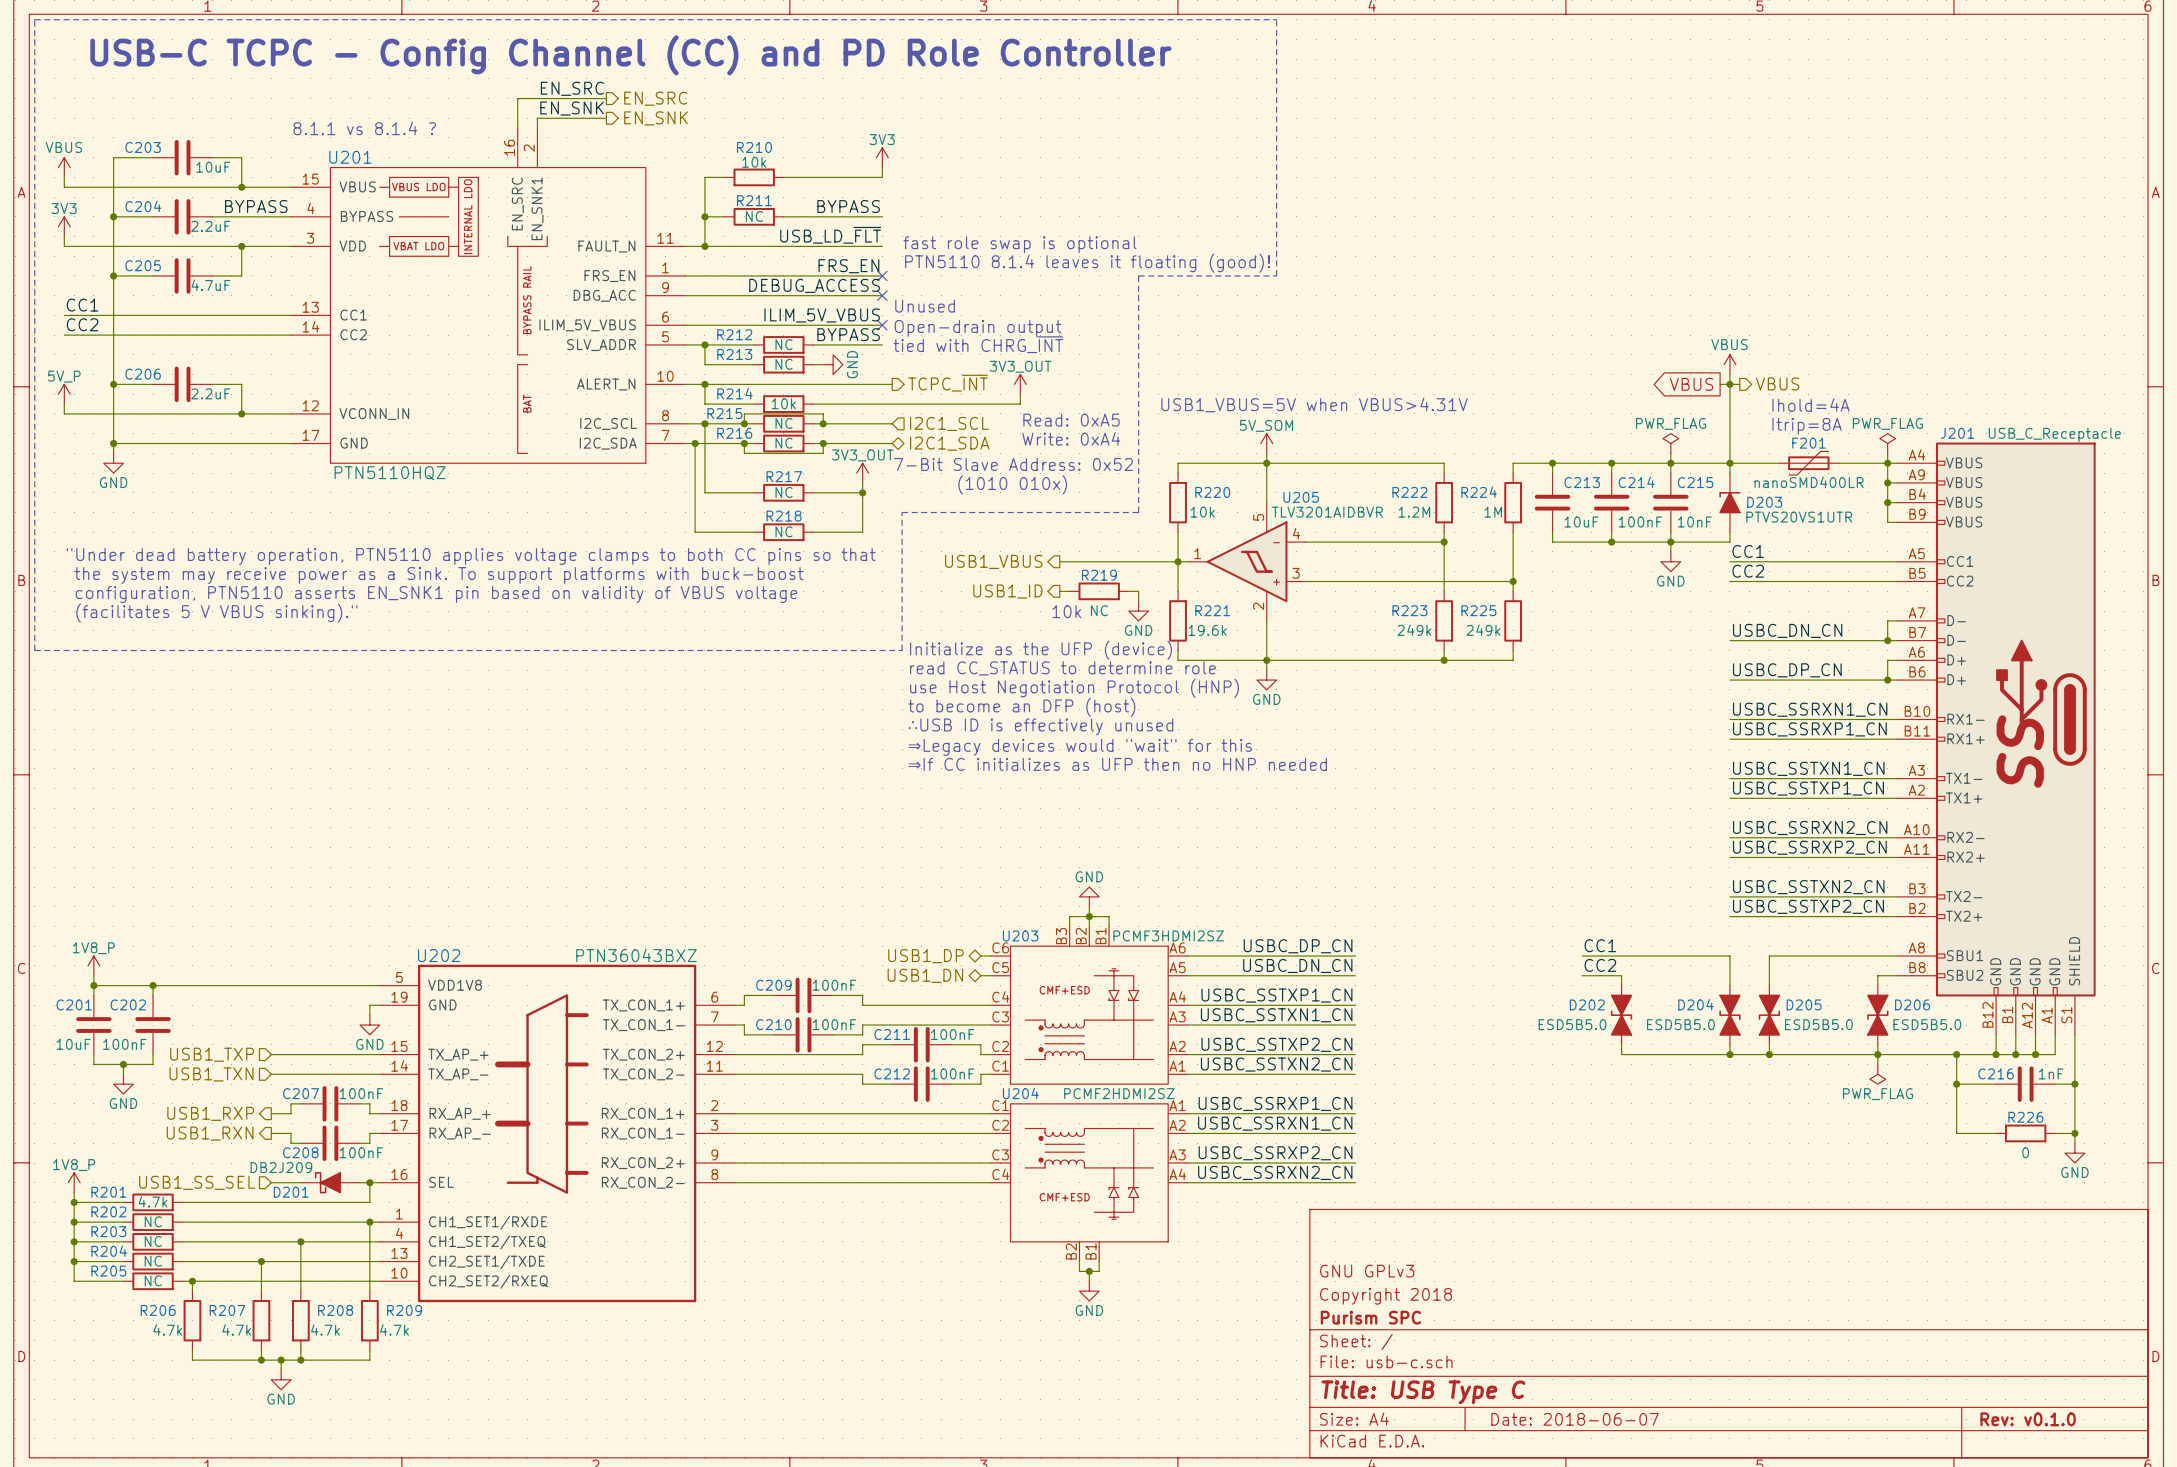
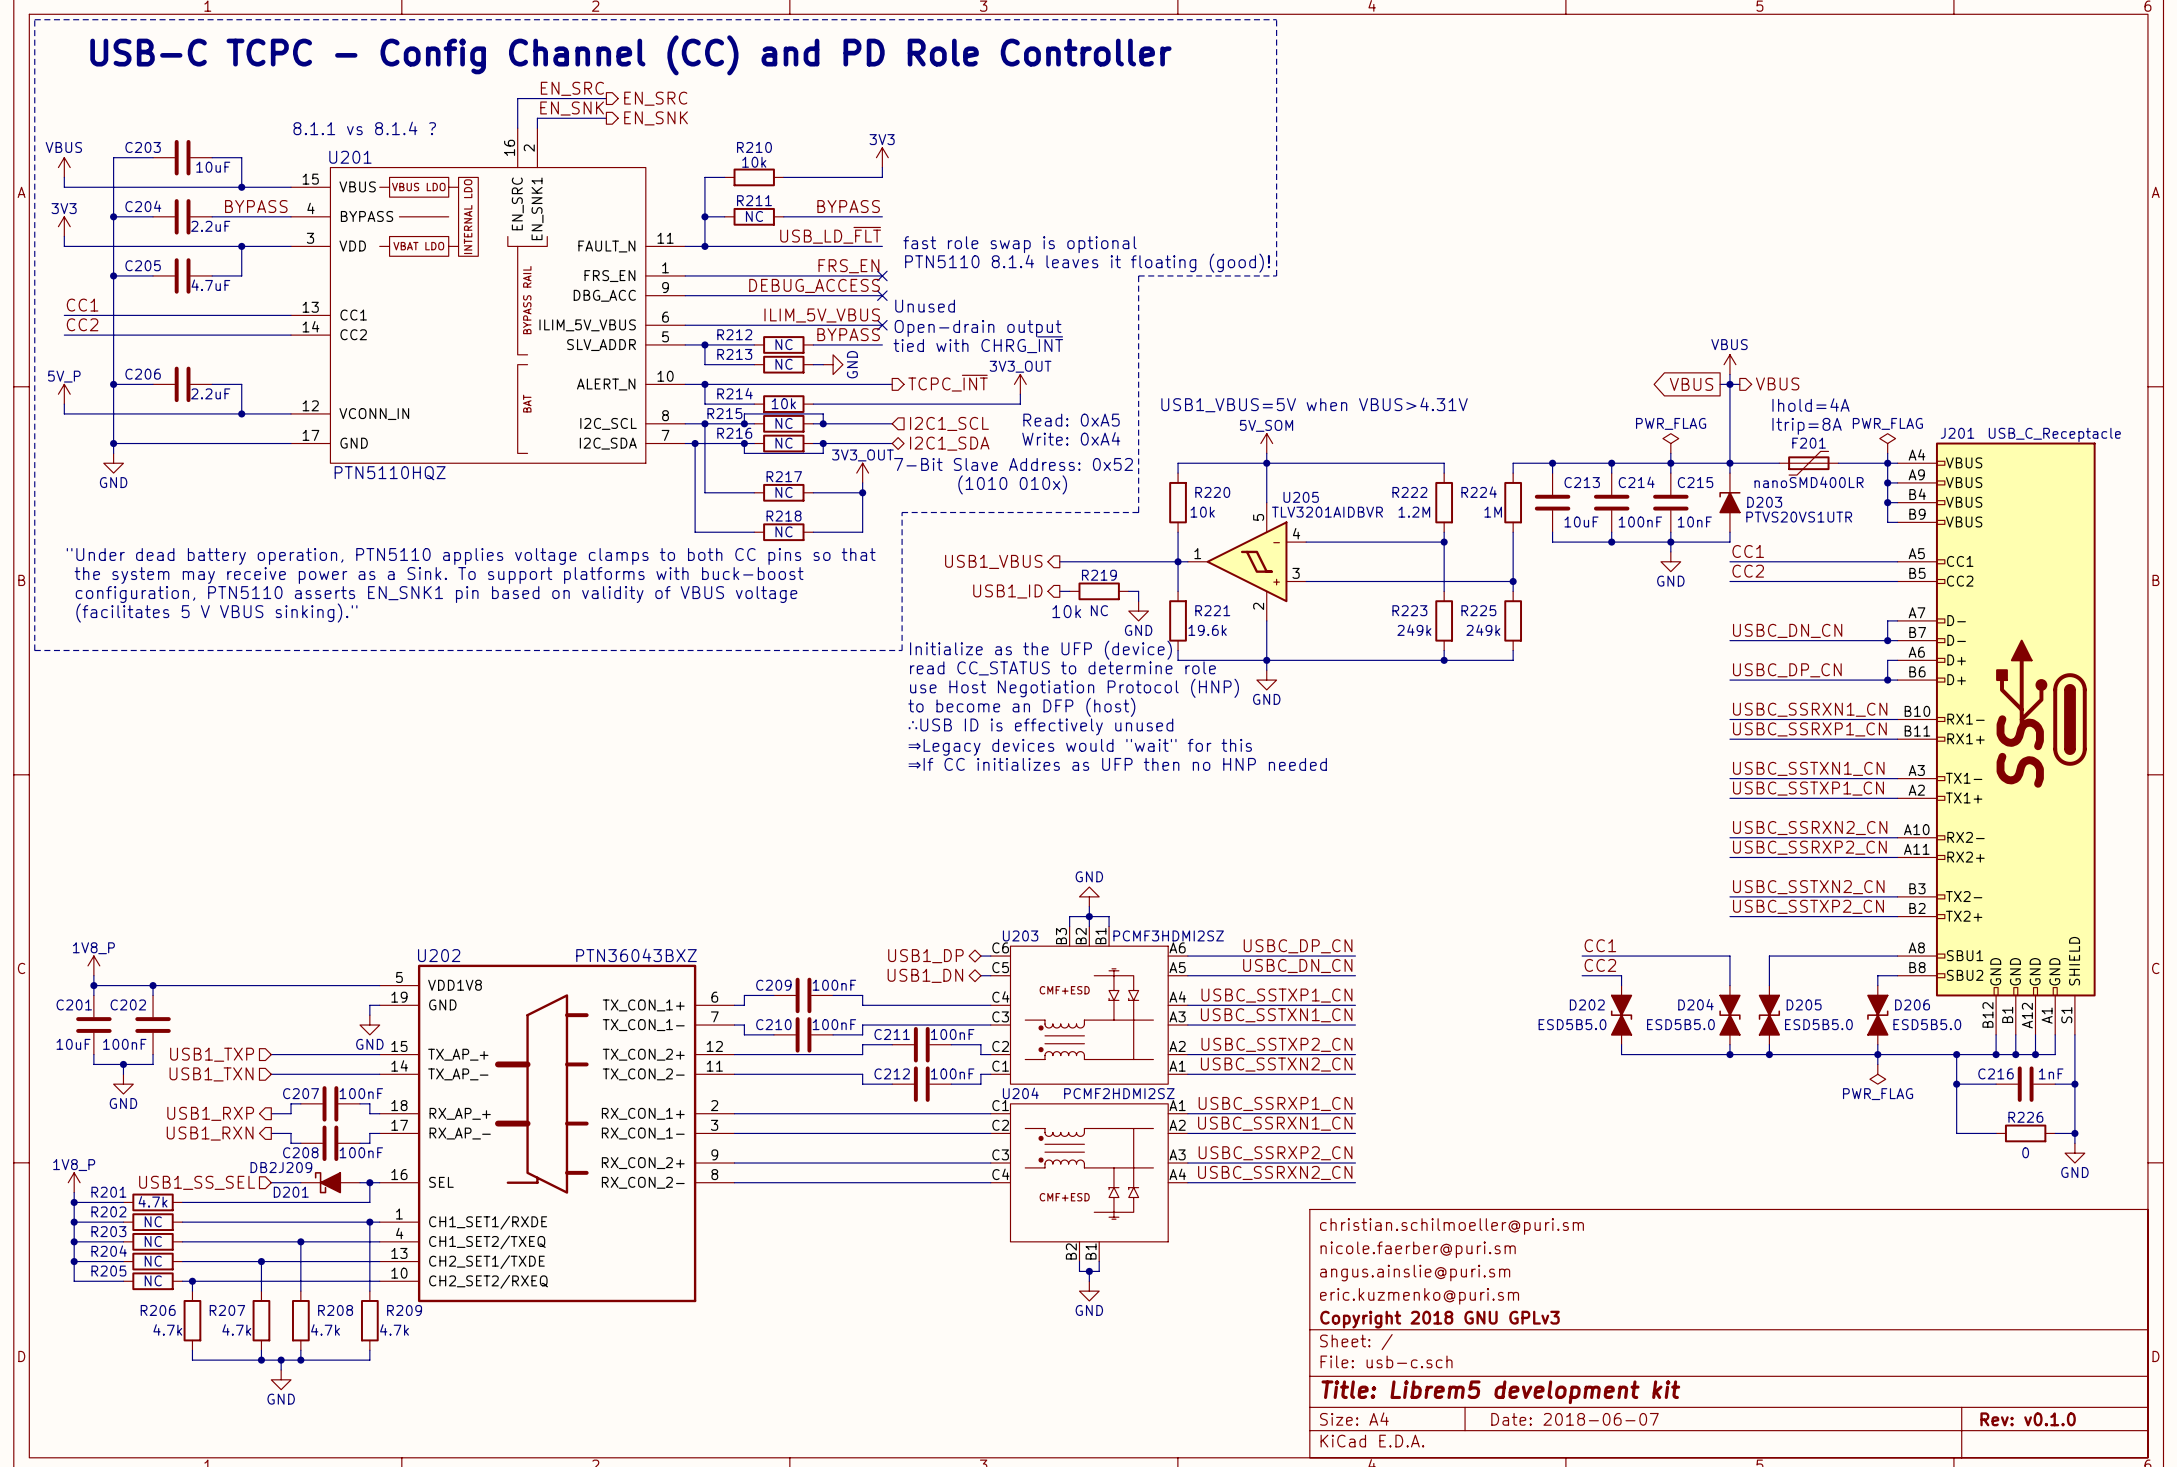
title block: none -> christian.schilmoeller@puri.sm (1451, 1226)
title block: none -> nicole.faerber@puri.sm (1418, 1249)
title block: GNU GPLv3 (1367, 1271) -> angus.ainslie@puri.sm (1415, 1273)
title block: Copyright 2018 (1386, 1296) -> eric.kuzmenko@puri.sm (1419, 1296)
title block: Purism SPC (1370, 1317) -> Copyright 2018 GNU GPLv3 (1439, 1319)
title block: Title: USB Type C (1423, 1392) -> Title: Librem5 development kit (1500, 1392)

